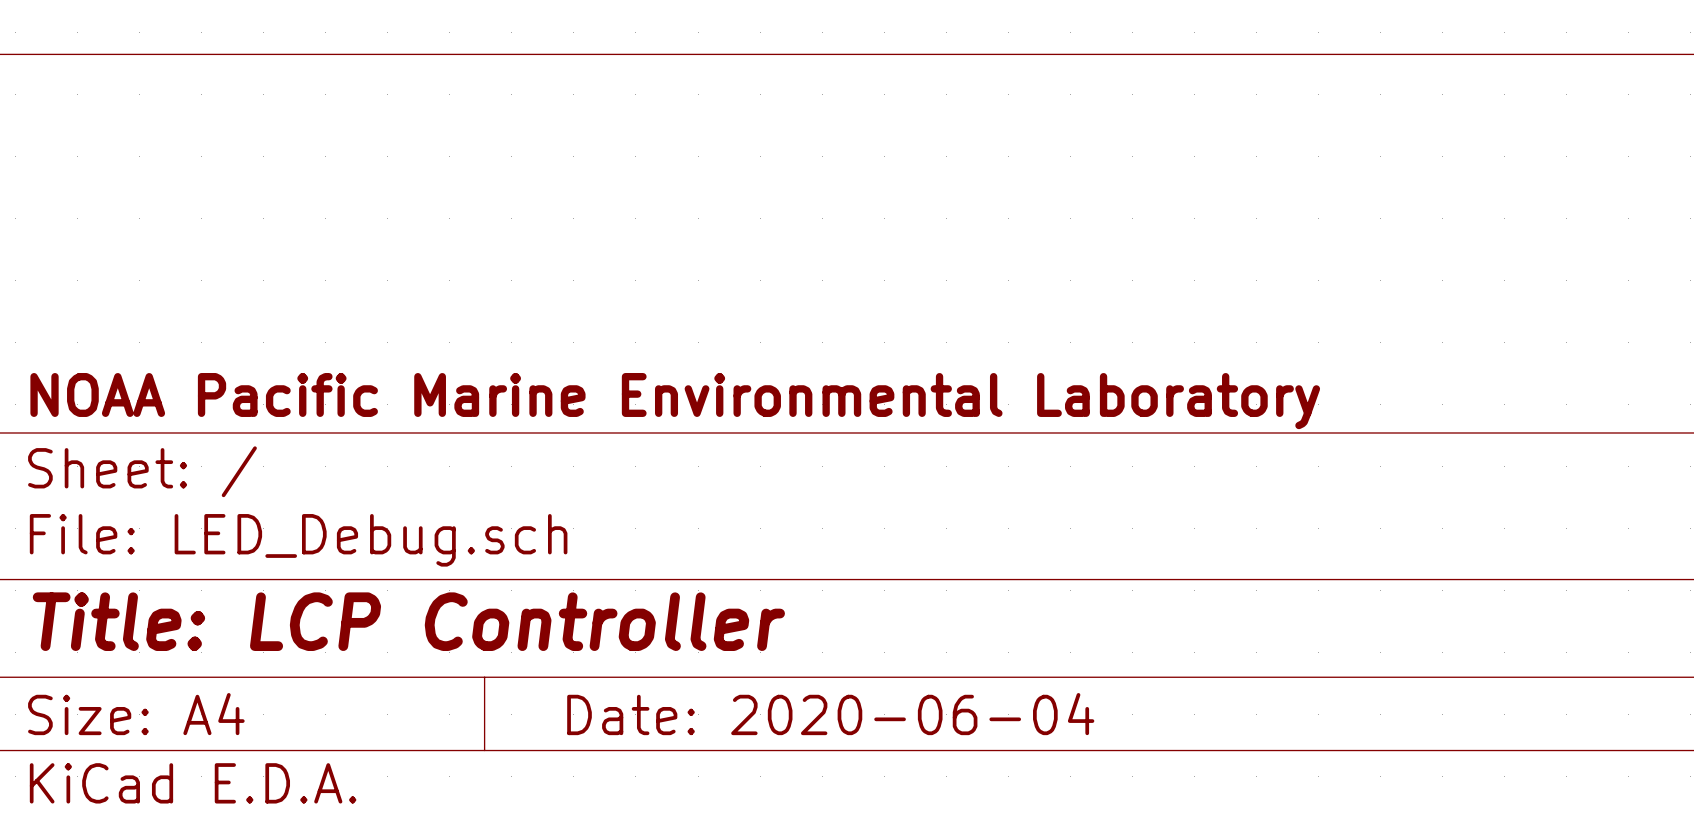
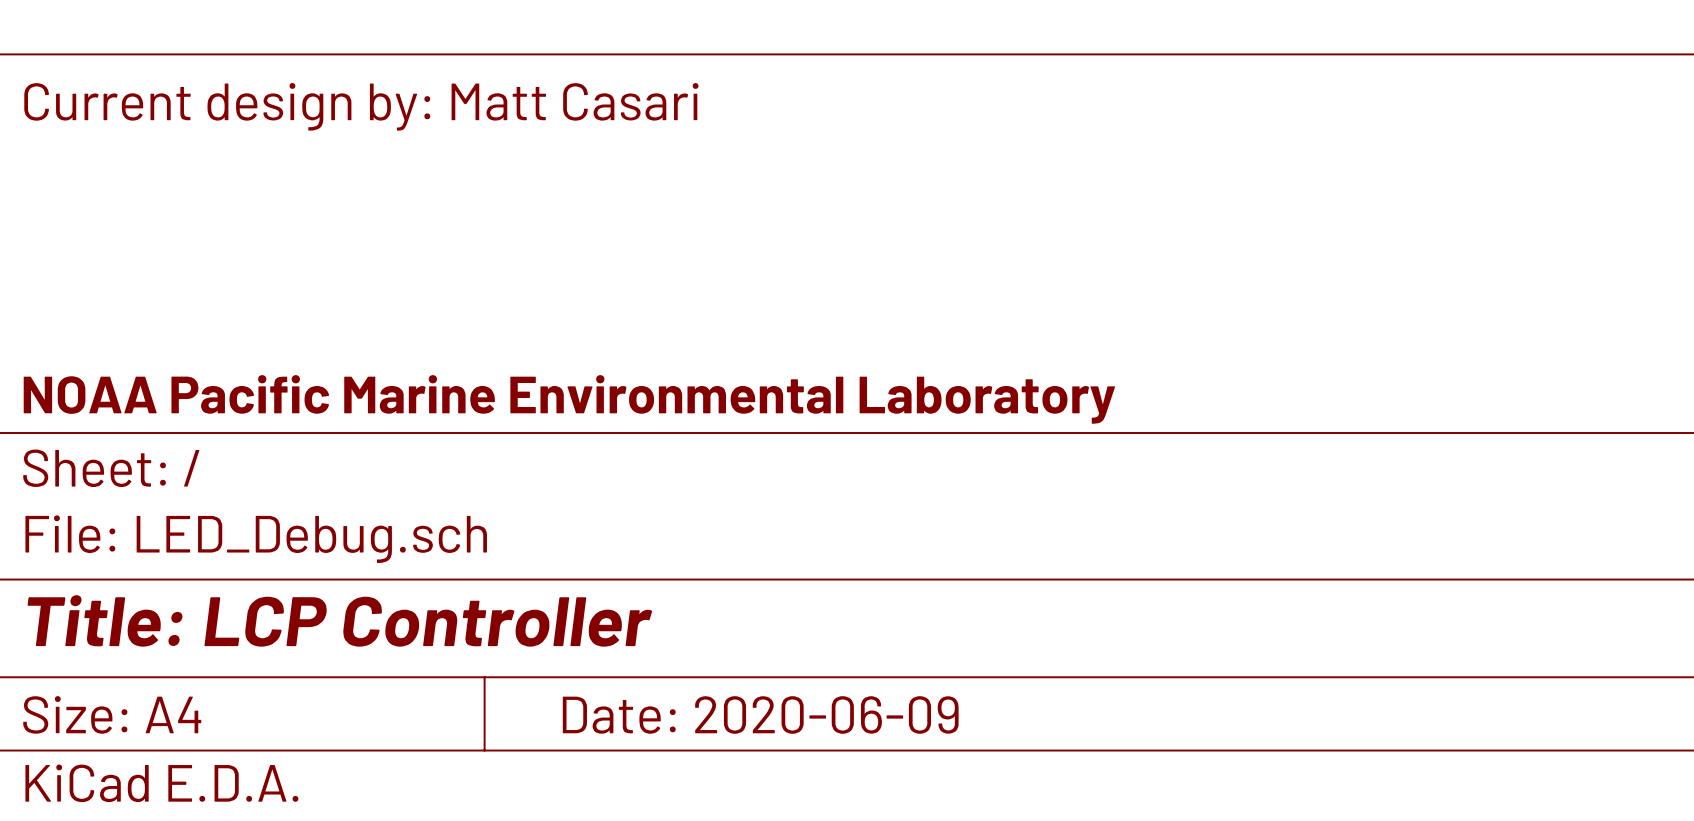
title block: none -> Current design by: Matt Casari (361, 106)
title block: Date: 2020-06-04 (830, 714) -> Date: 2020-06-09 (760, 714)

